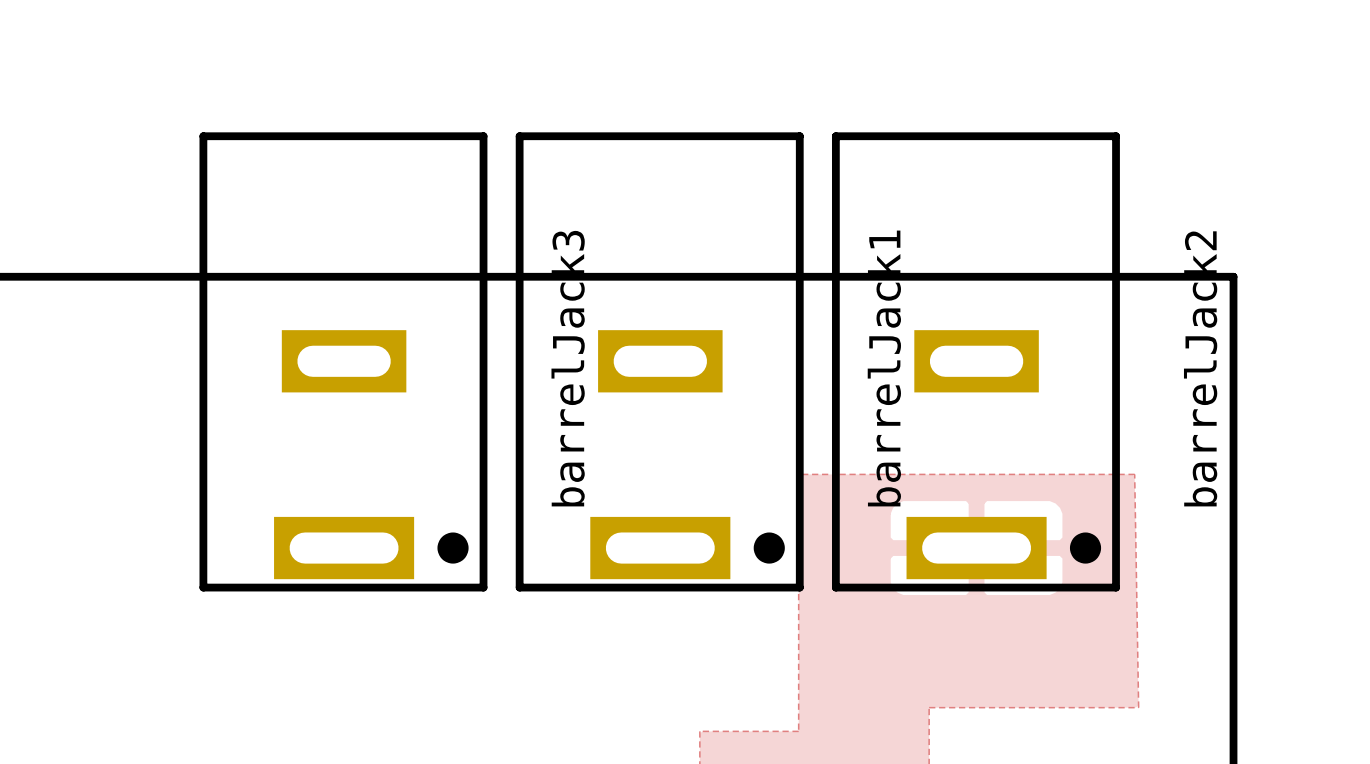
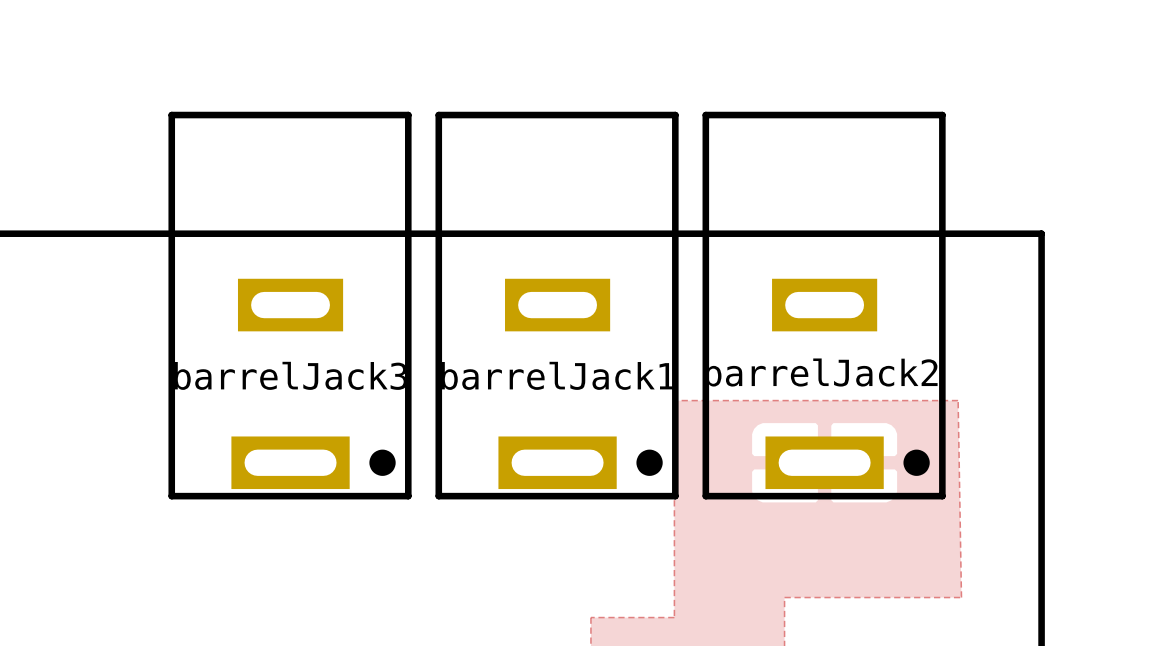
barrelJack3 name rotation: 0° (568, 368) -> 90° clockwise (290, 375)
barrelJack1 name rotation: 0° (884, 368) -> 90° clockwise (558, 375)
barrelJack2 name rotation: 0° (1200, 368) -> 90° clockwise (821, 372)

